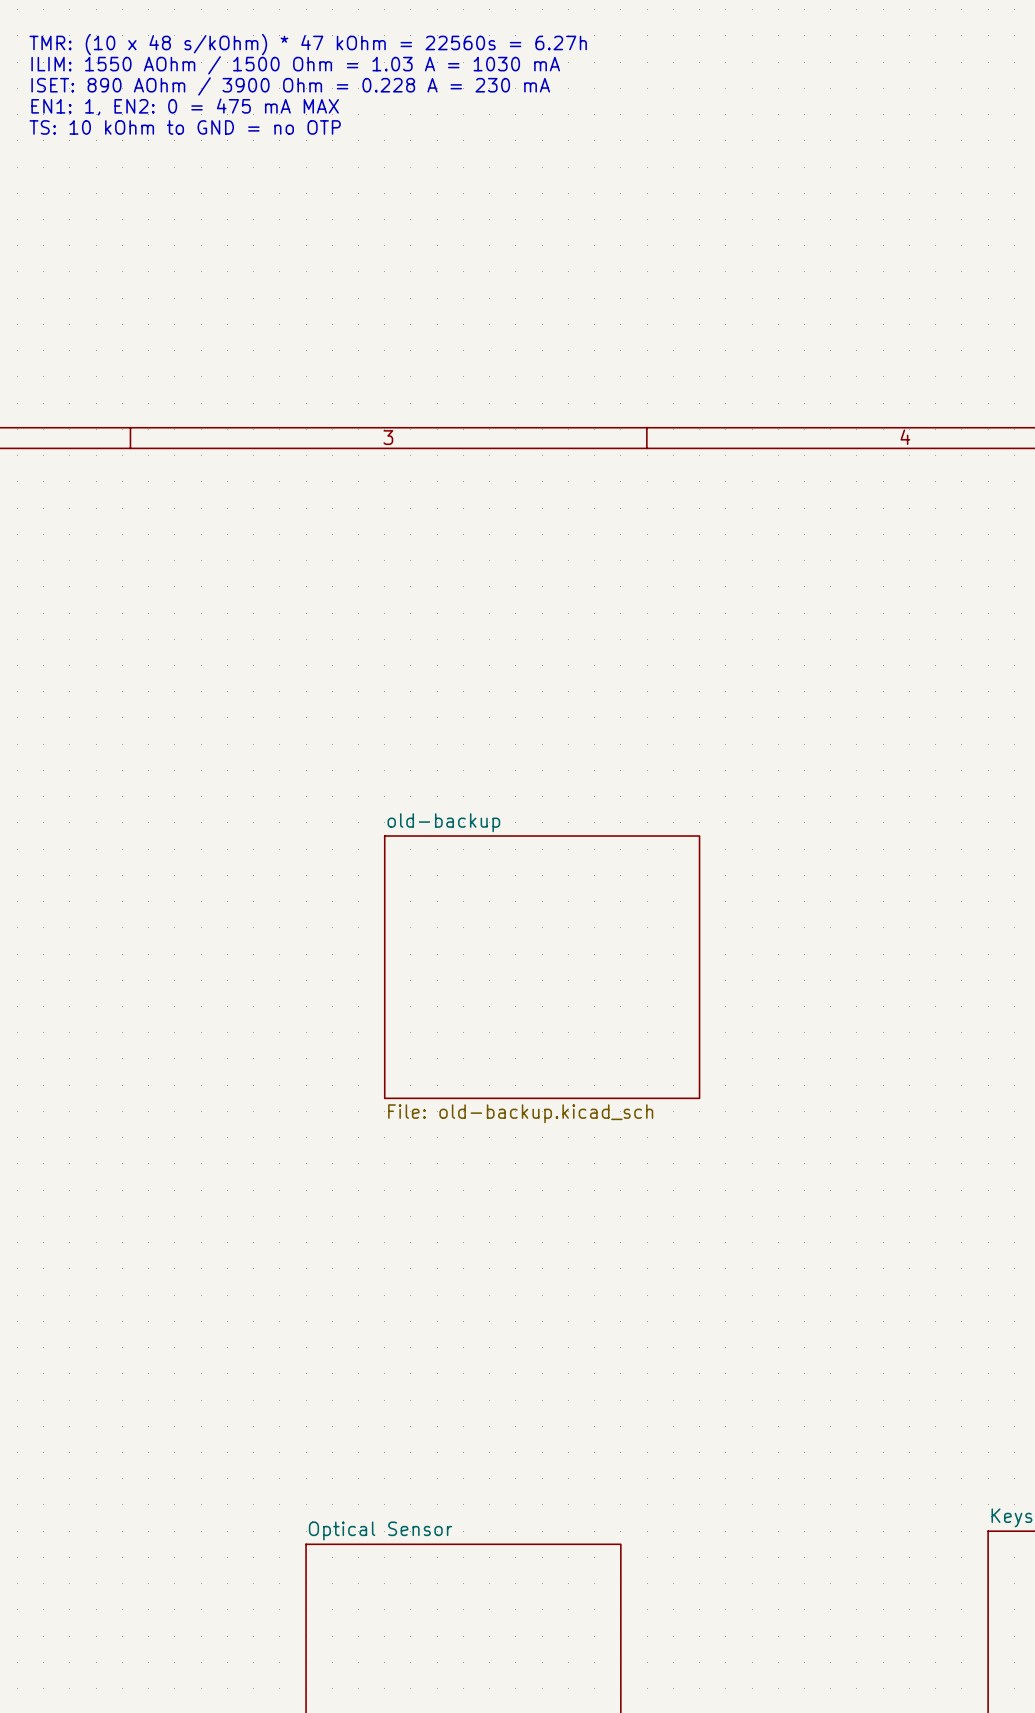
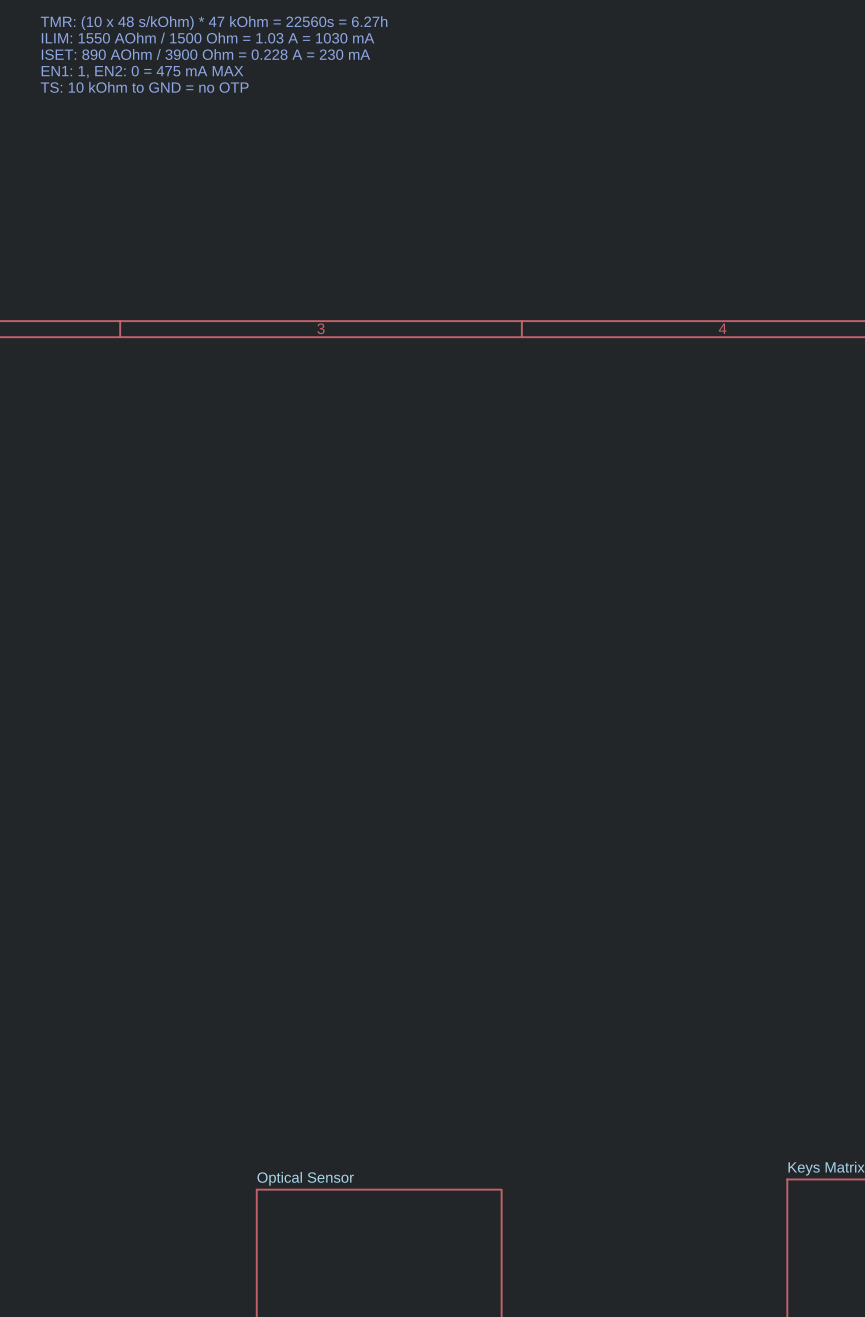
sheet old-backup: File: old-backup.kicad_sch (542, 967) -> none

